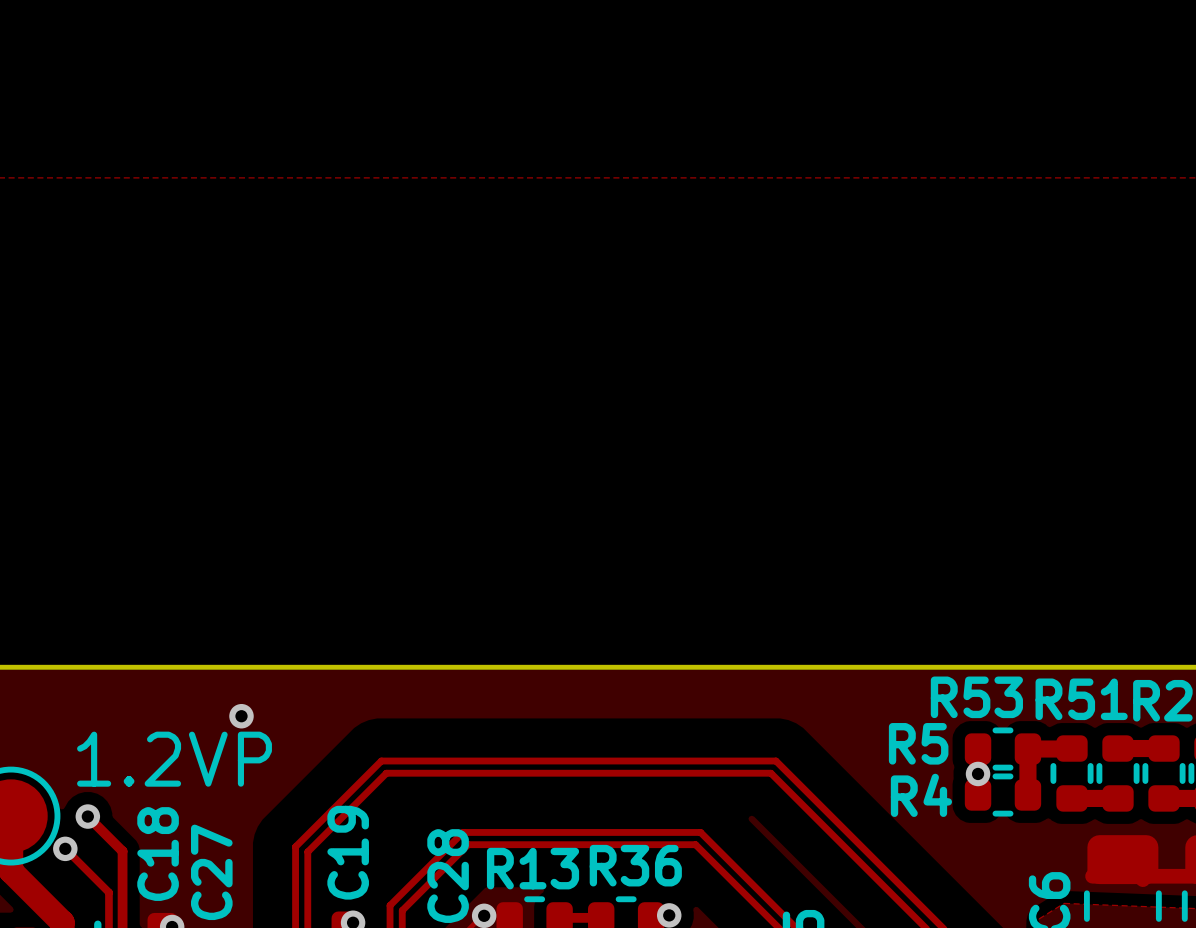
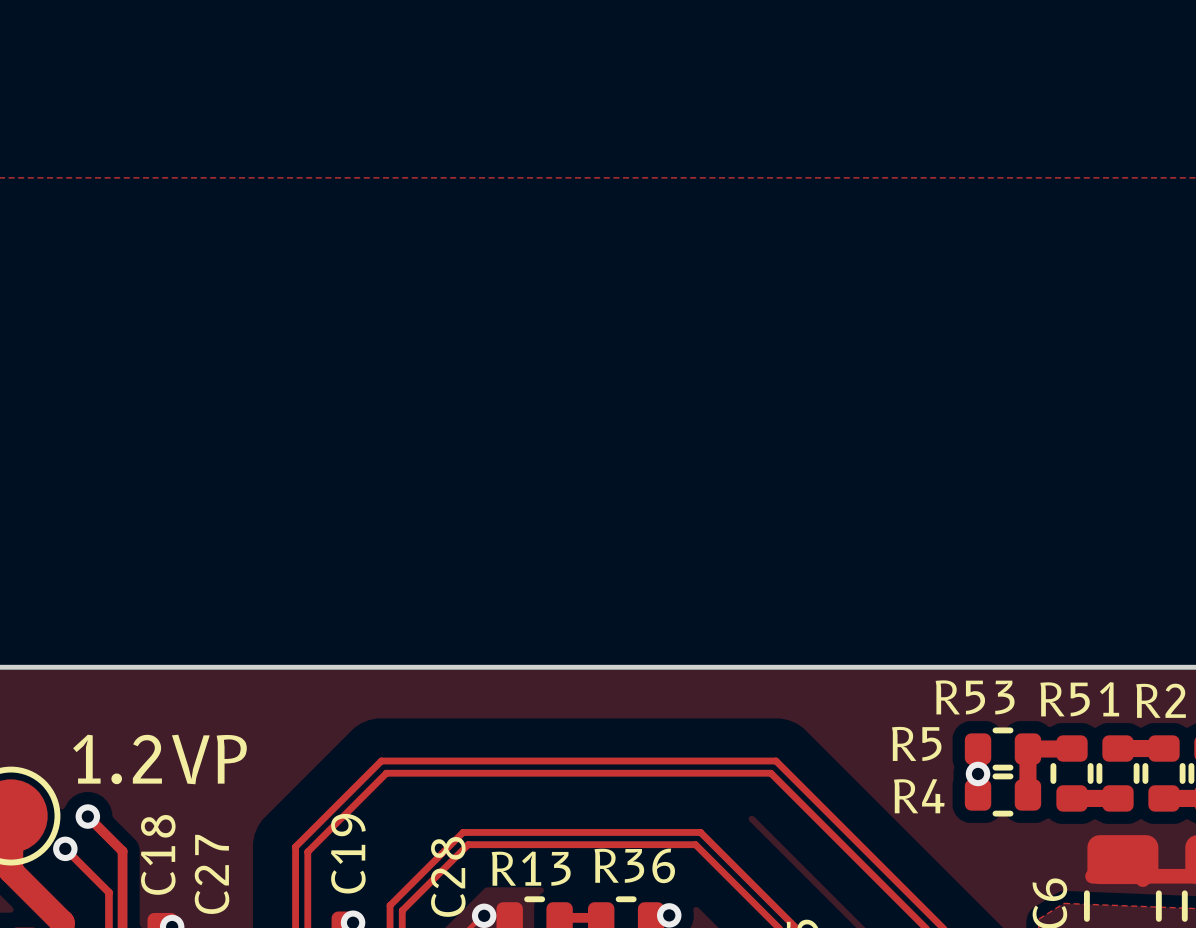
via: (241, 716) -> none

